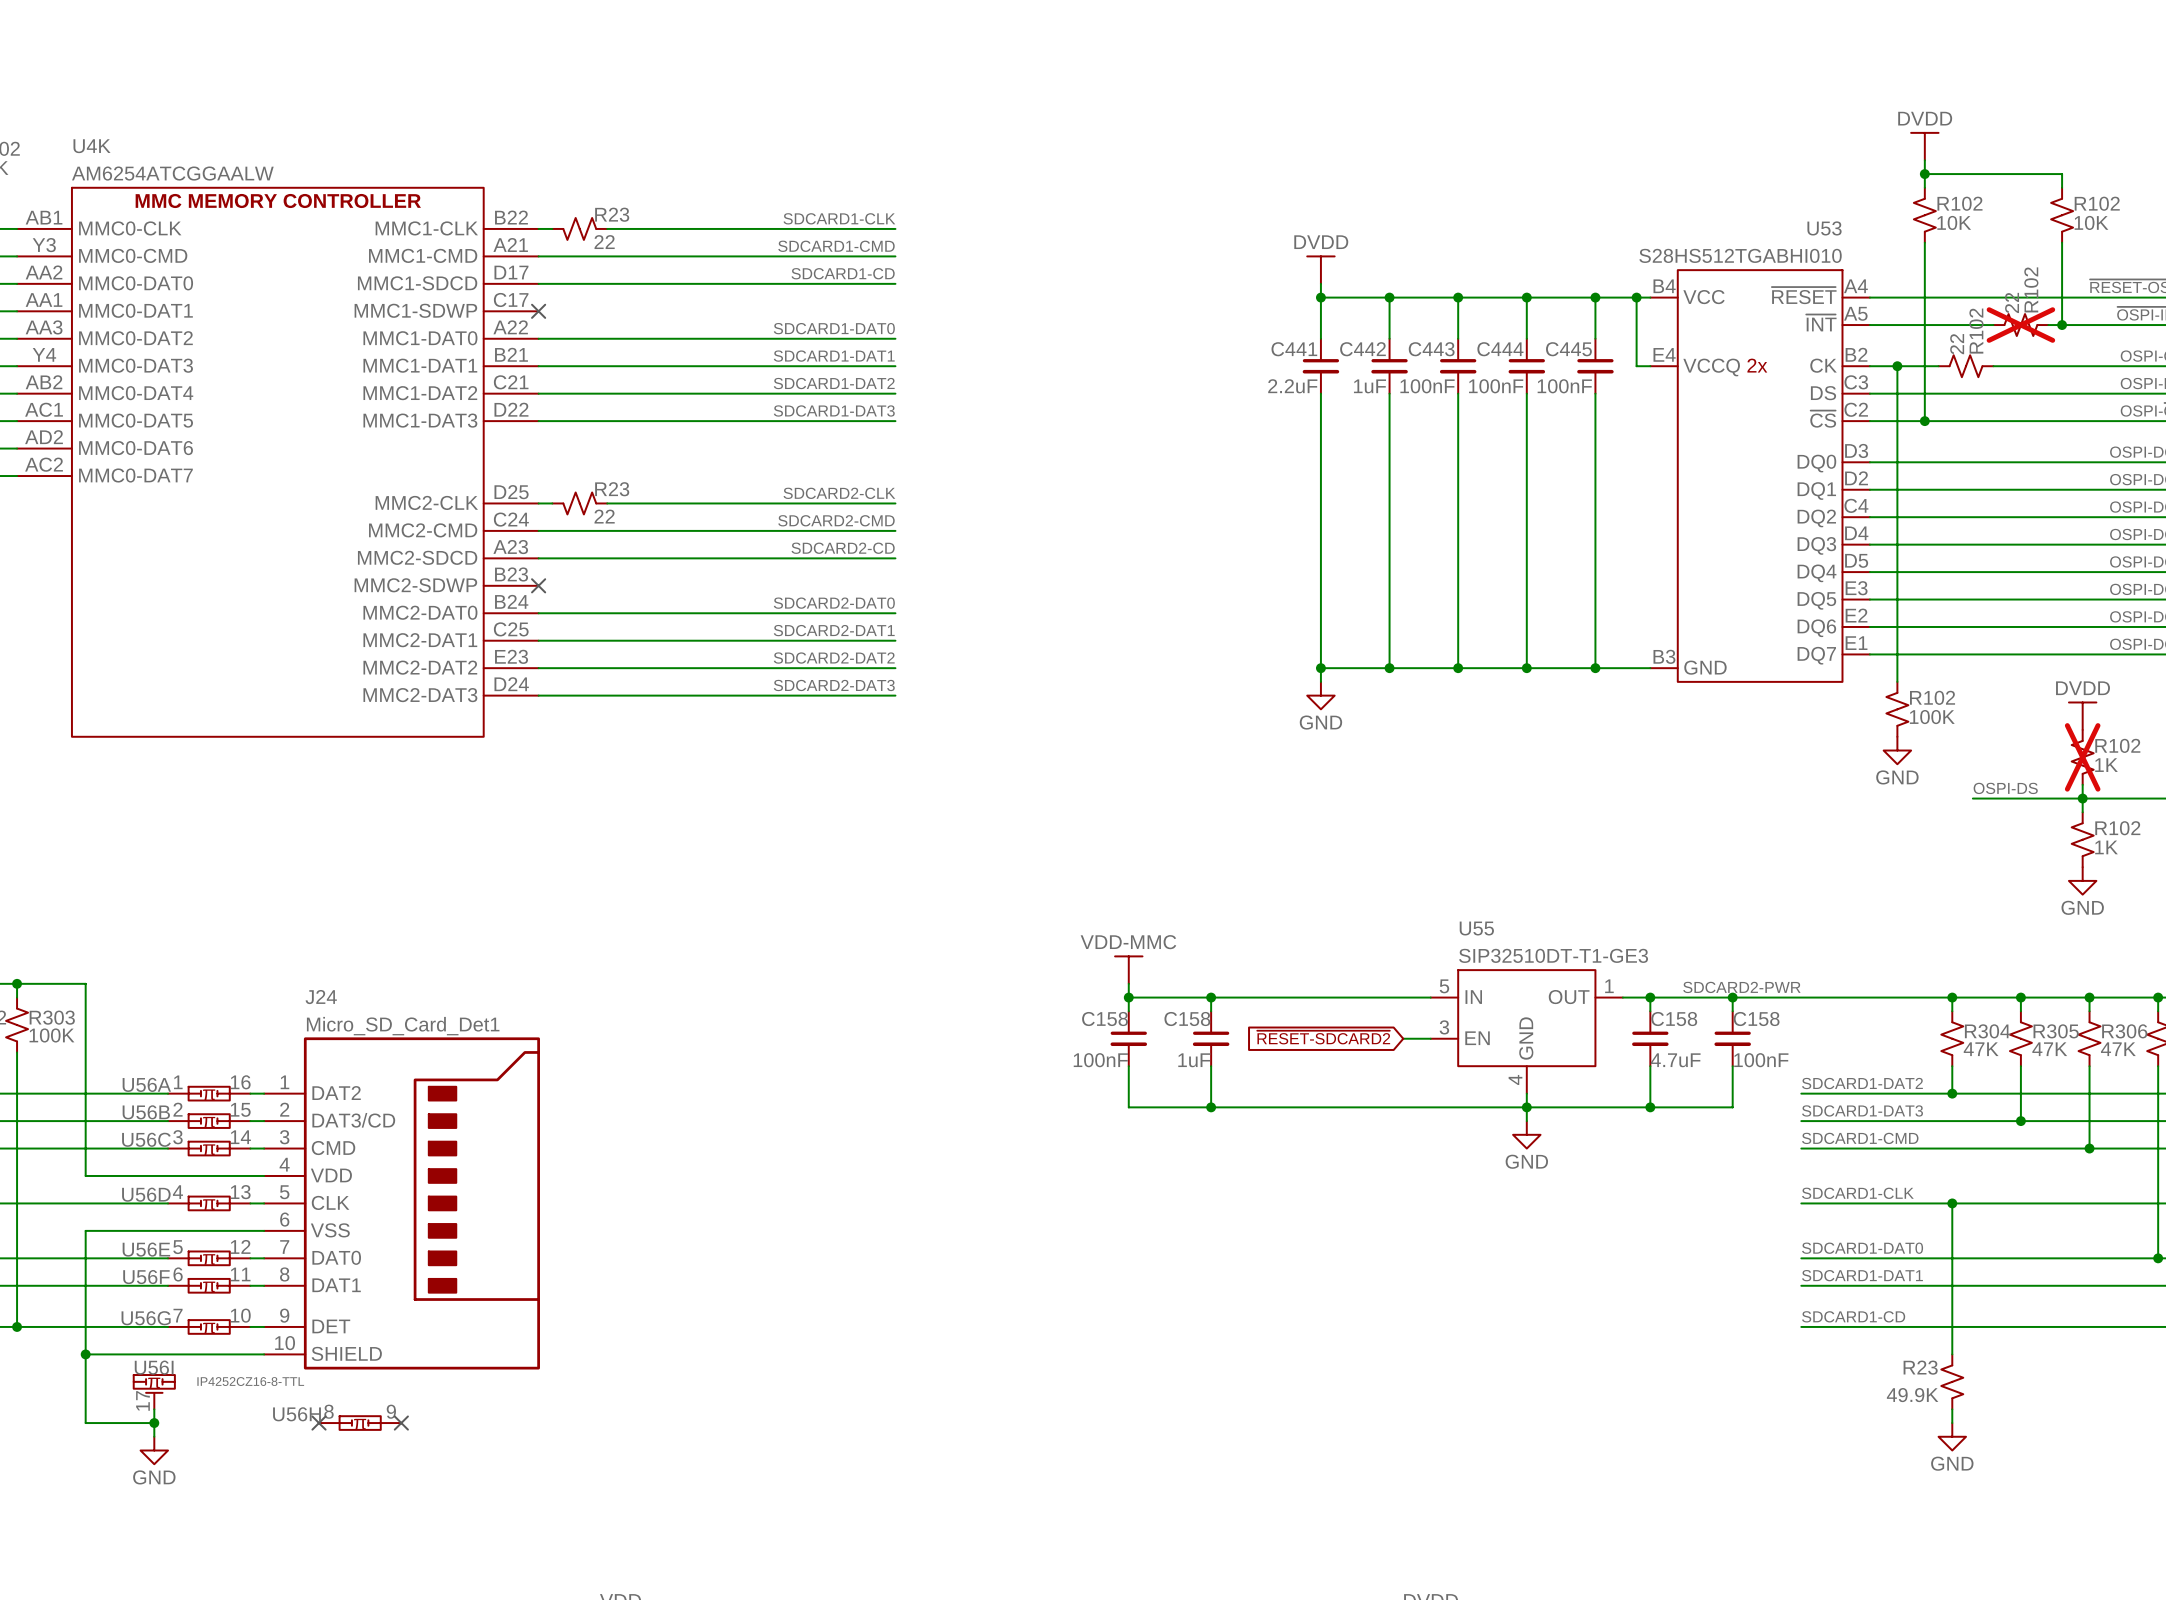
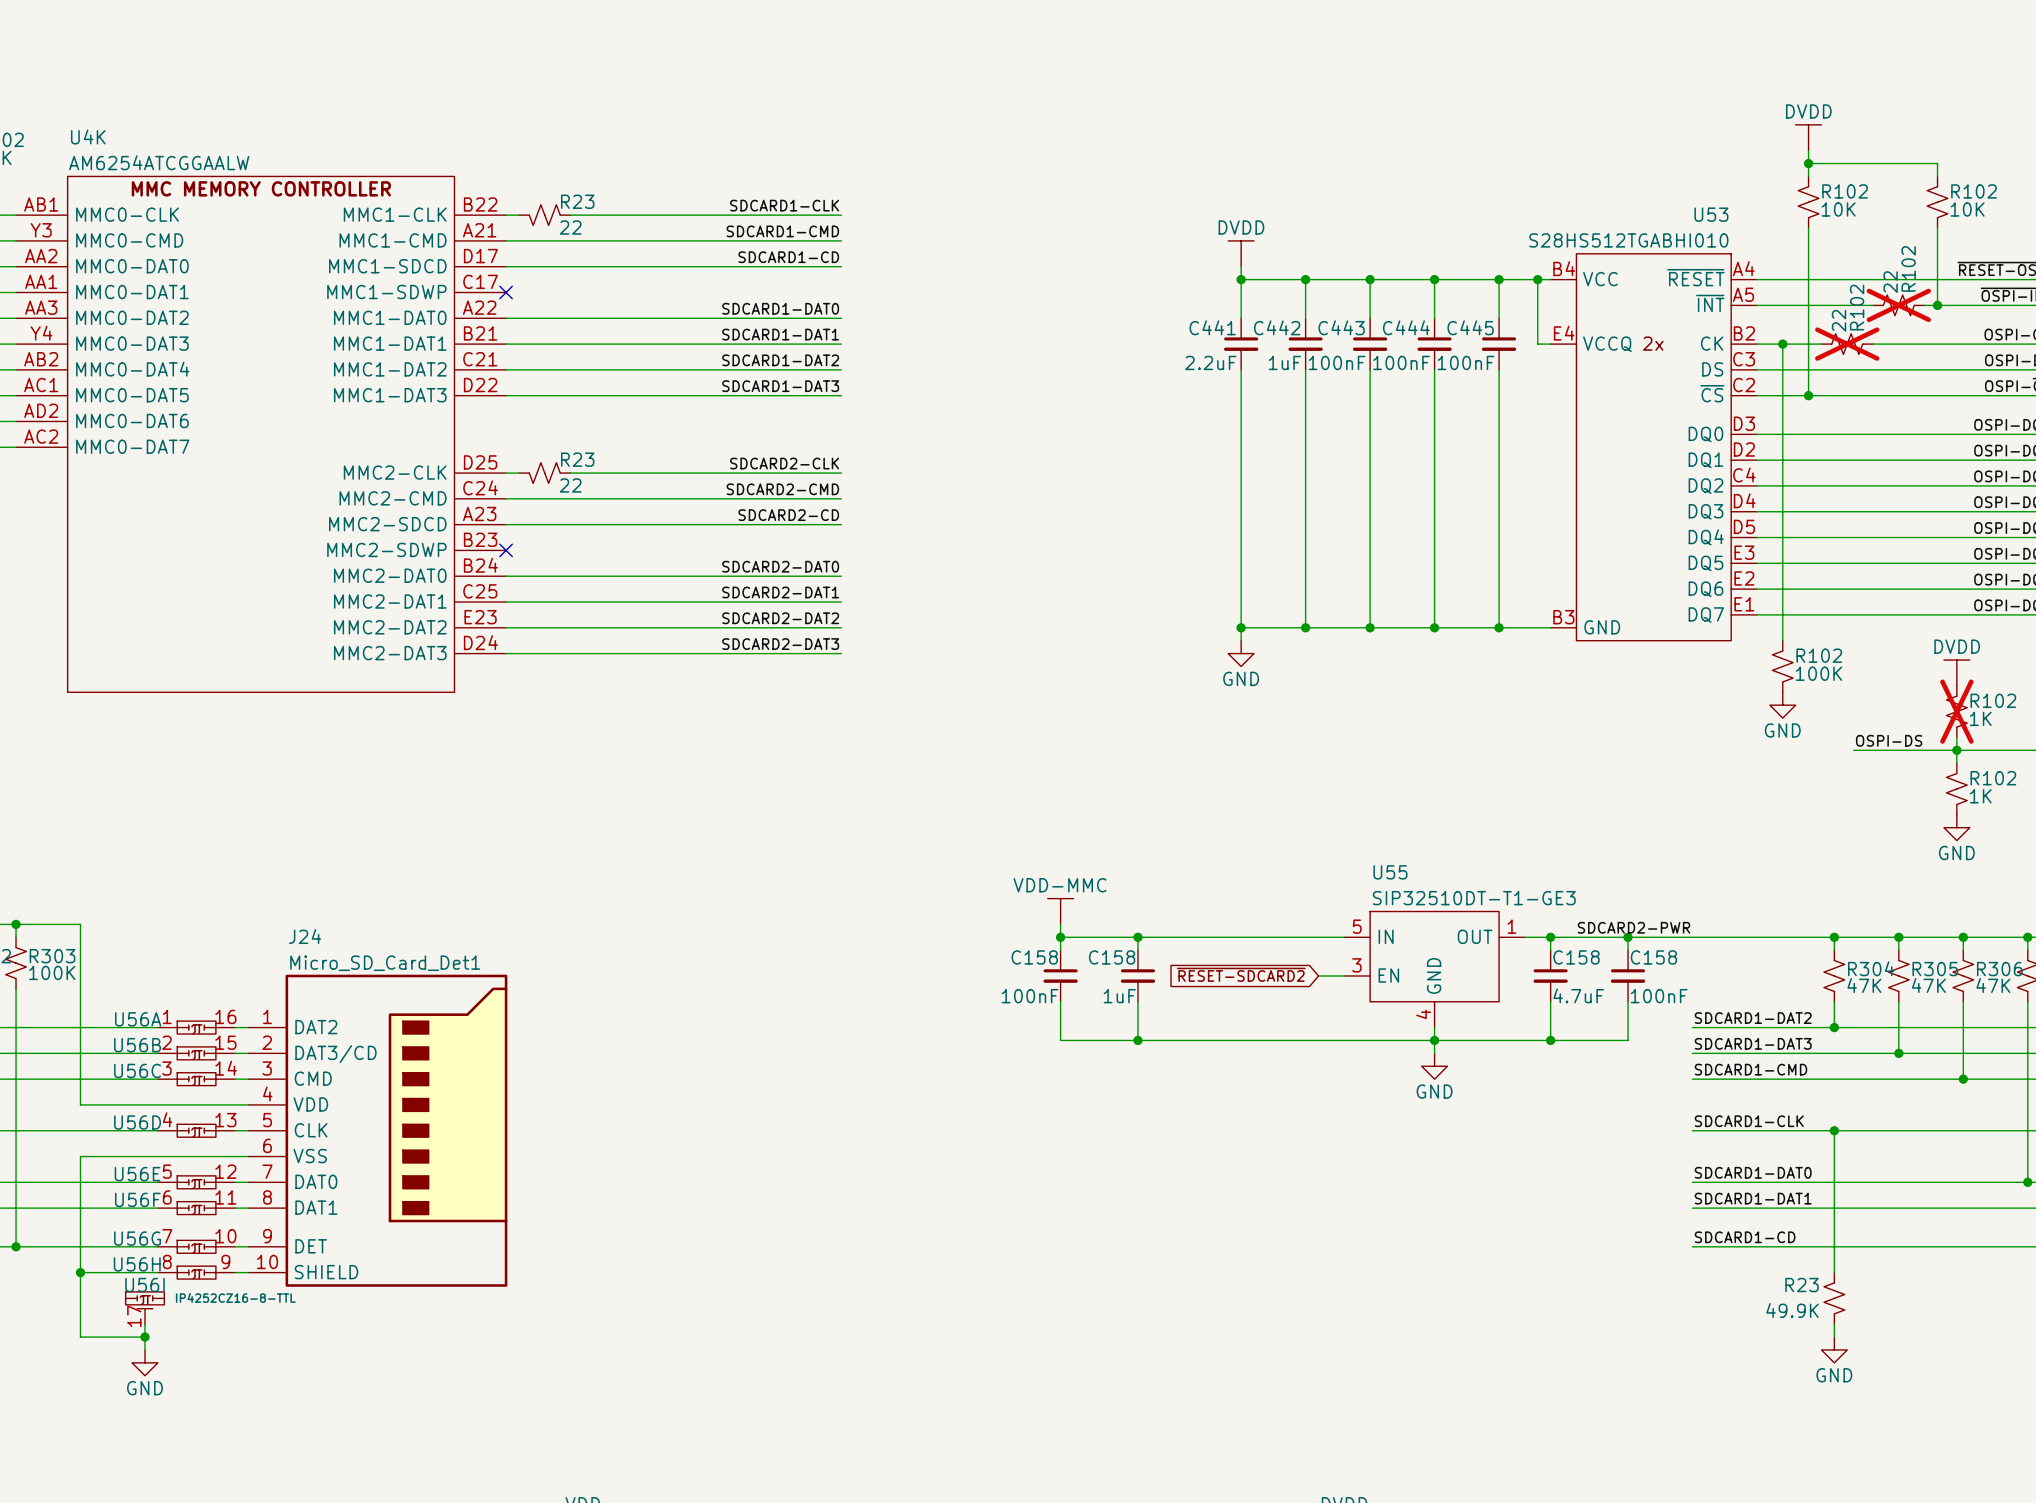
R102 do-not-place cross: none -> (1847, 344)
no-connect mark: (319, 1423) -> none
U56H position: (360, 1423) -> (196, 1272)
no-connect mark: (401, 1423) -> none

